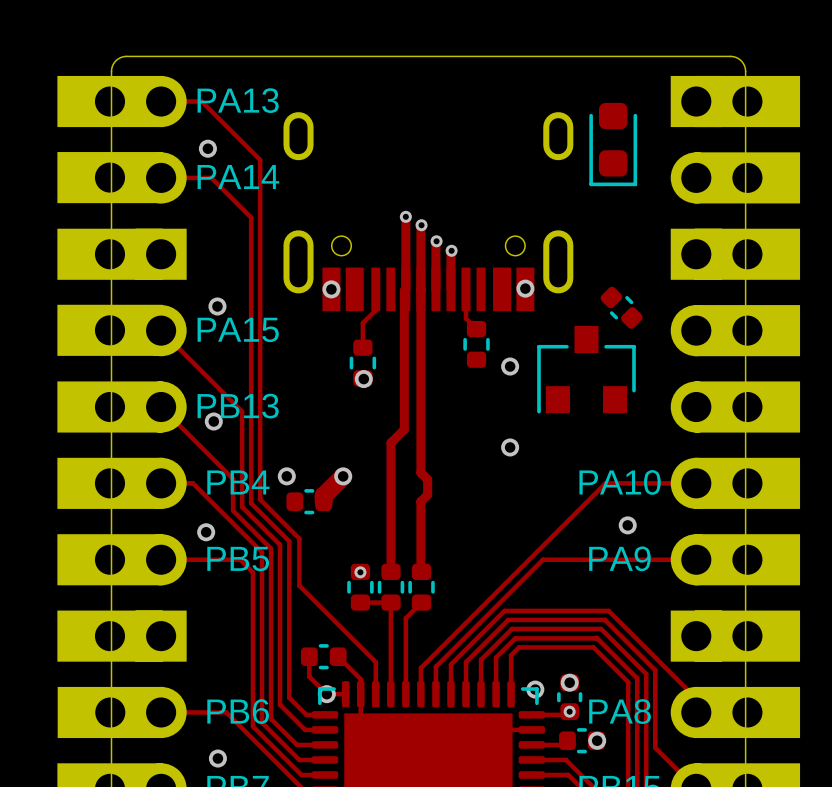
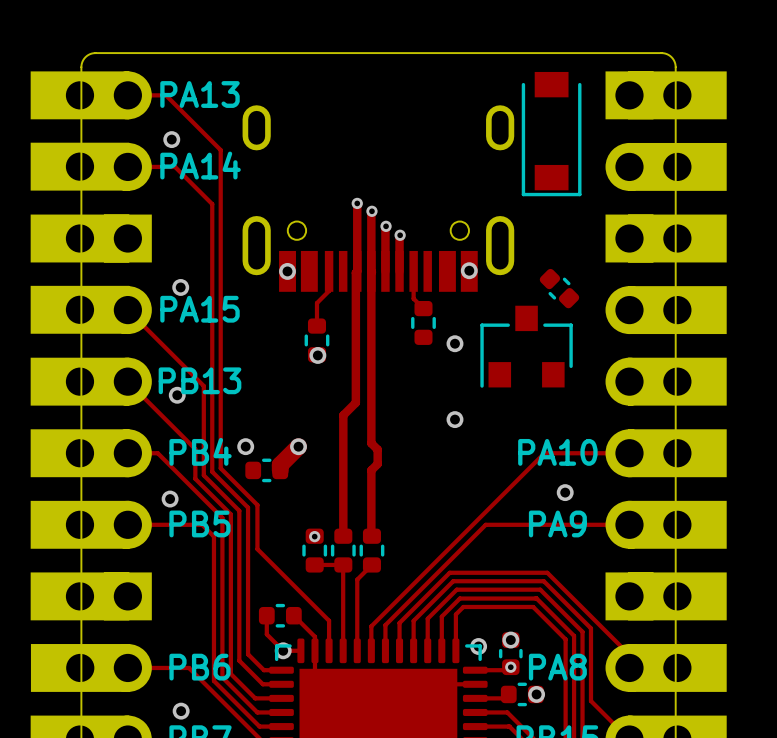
part footprint: [589, 102, 638, 187] -> [521, 71, 582, 197]

